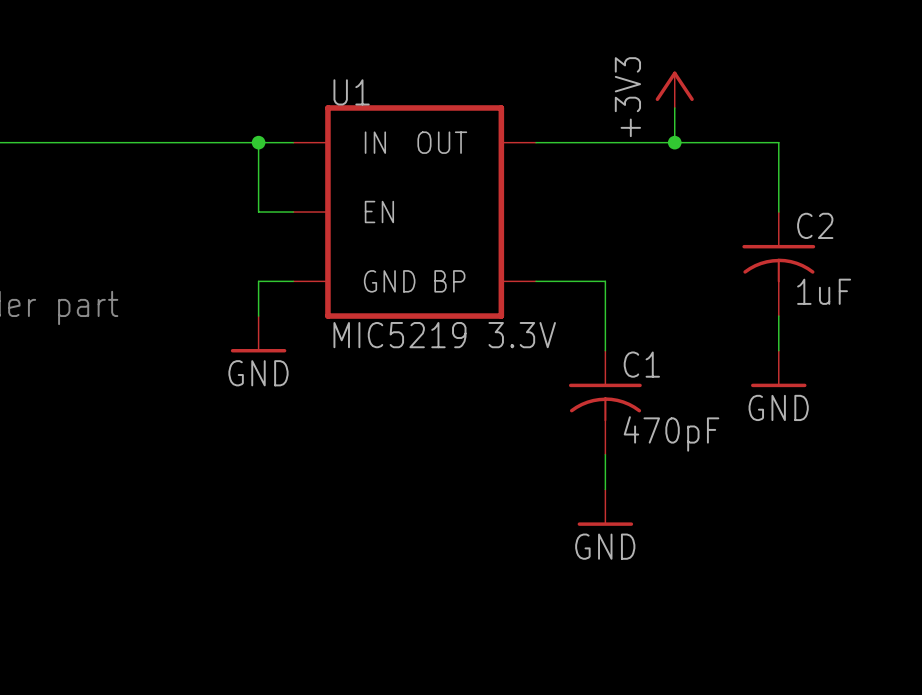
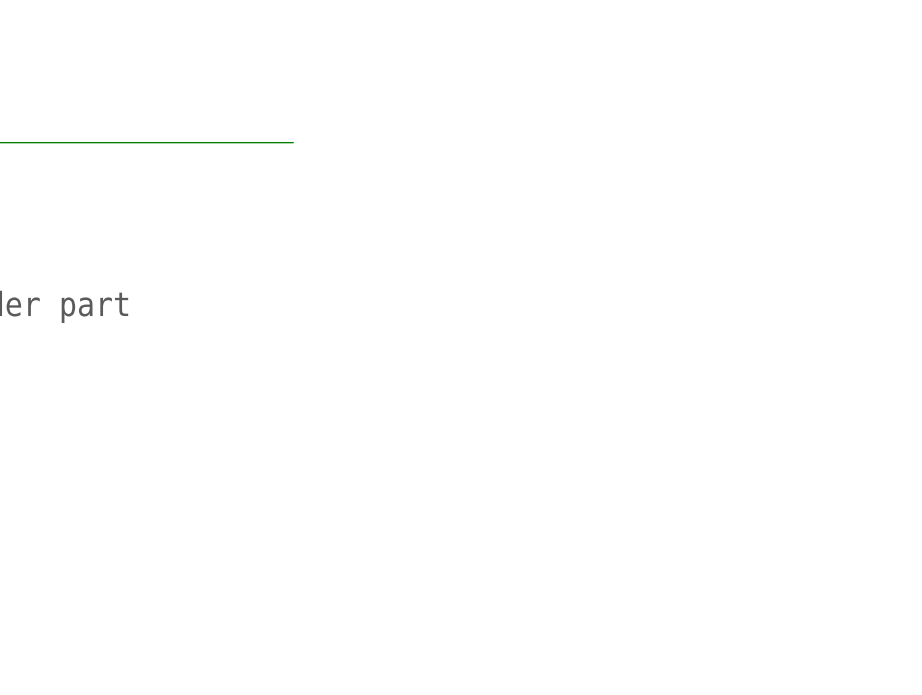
power symbol: +3V3 (674, 89) -> none
wire: (674, 107) (674, 142) -> none
wire: (258, 142) (258, 212) (293, 212) -> none
junction: (258, 142) -> none
wire: (536, 142) (778, 142) (778, 212) -> none
junction: (674, 142) -> none
U1: MIC5219 3.3V (414, 212) -> none
C2: 1uF (778, 264) -> none
wire: (293, 281) (258, 281) (258, 316) -> none
wire: (536, 281) (605, 281) (605, 350) -> none
wire: (778, 316) (778, 350) -> none
power symbol: GND (258, 334) -> none
power symbol: GND (778, 368) -> none
C1: 470pF (605, 402) -> none
wire: (605, 454) (605, 489) -> none
power symbol: GND (605, 507) -> none

